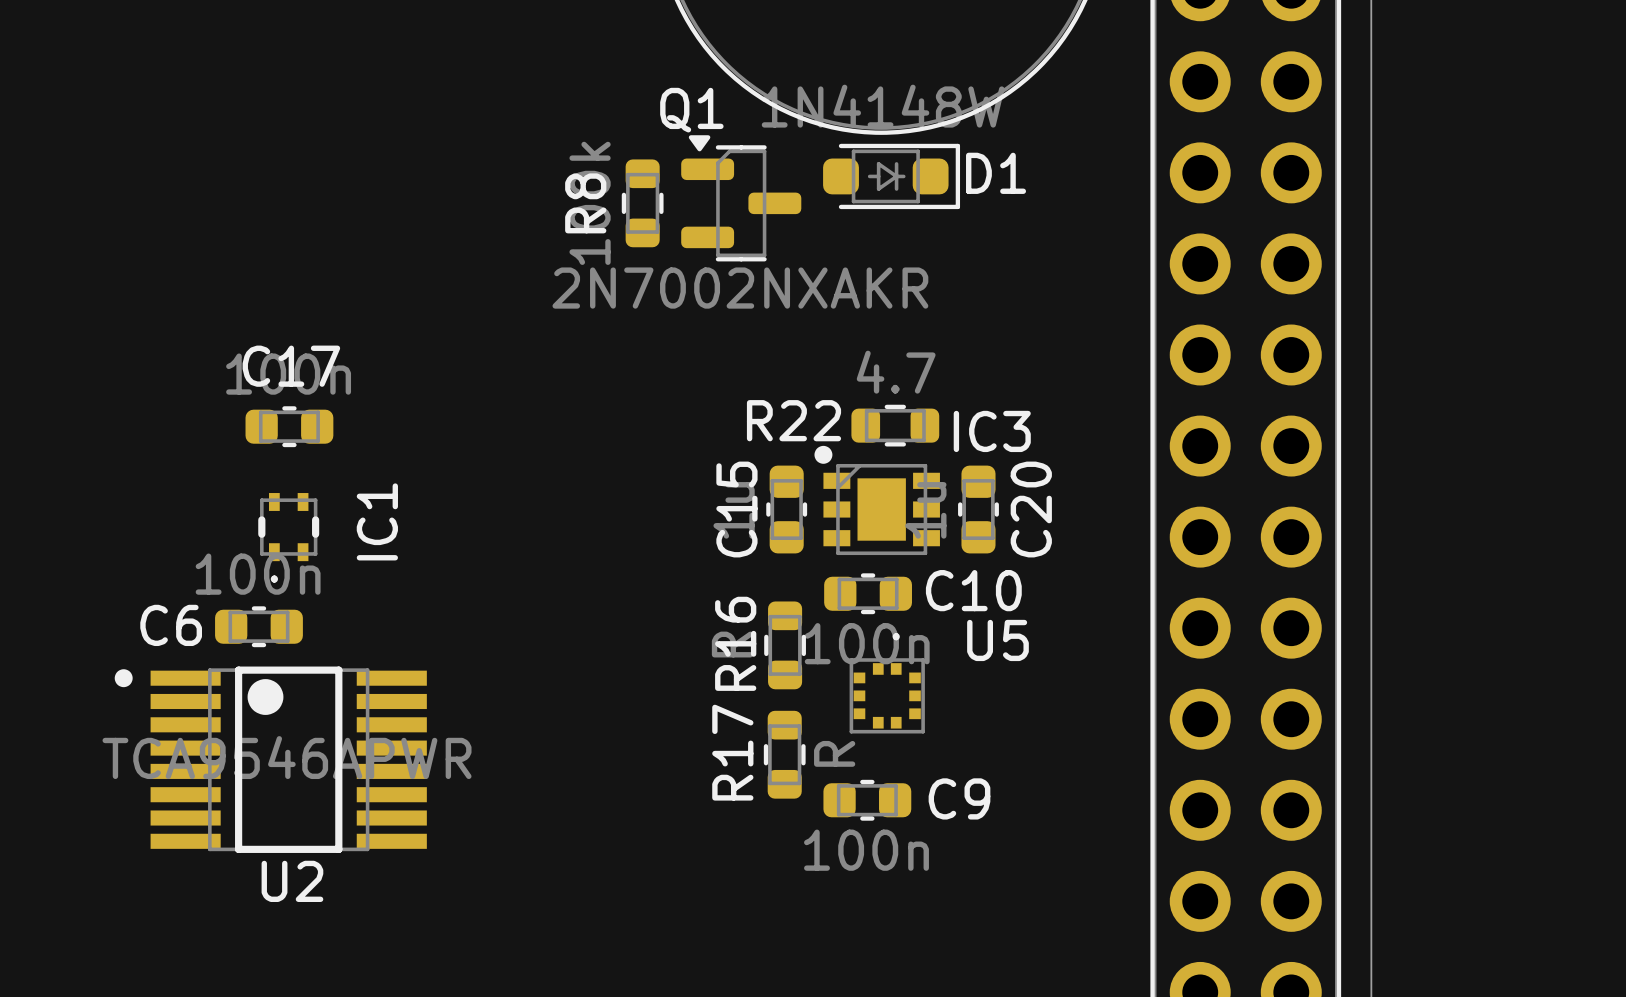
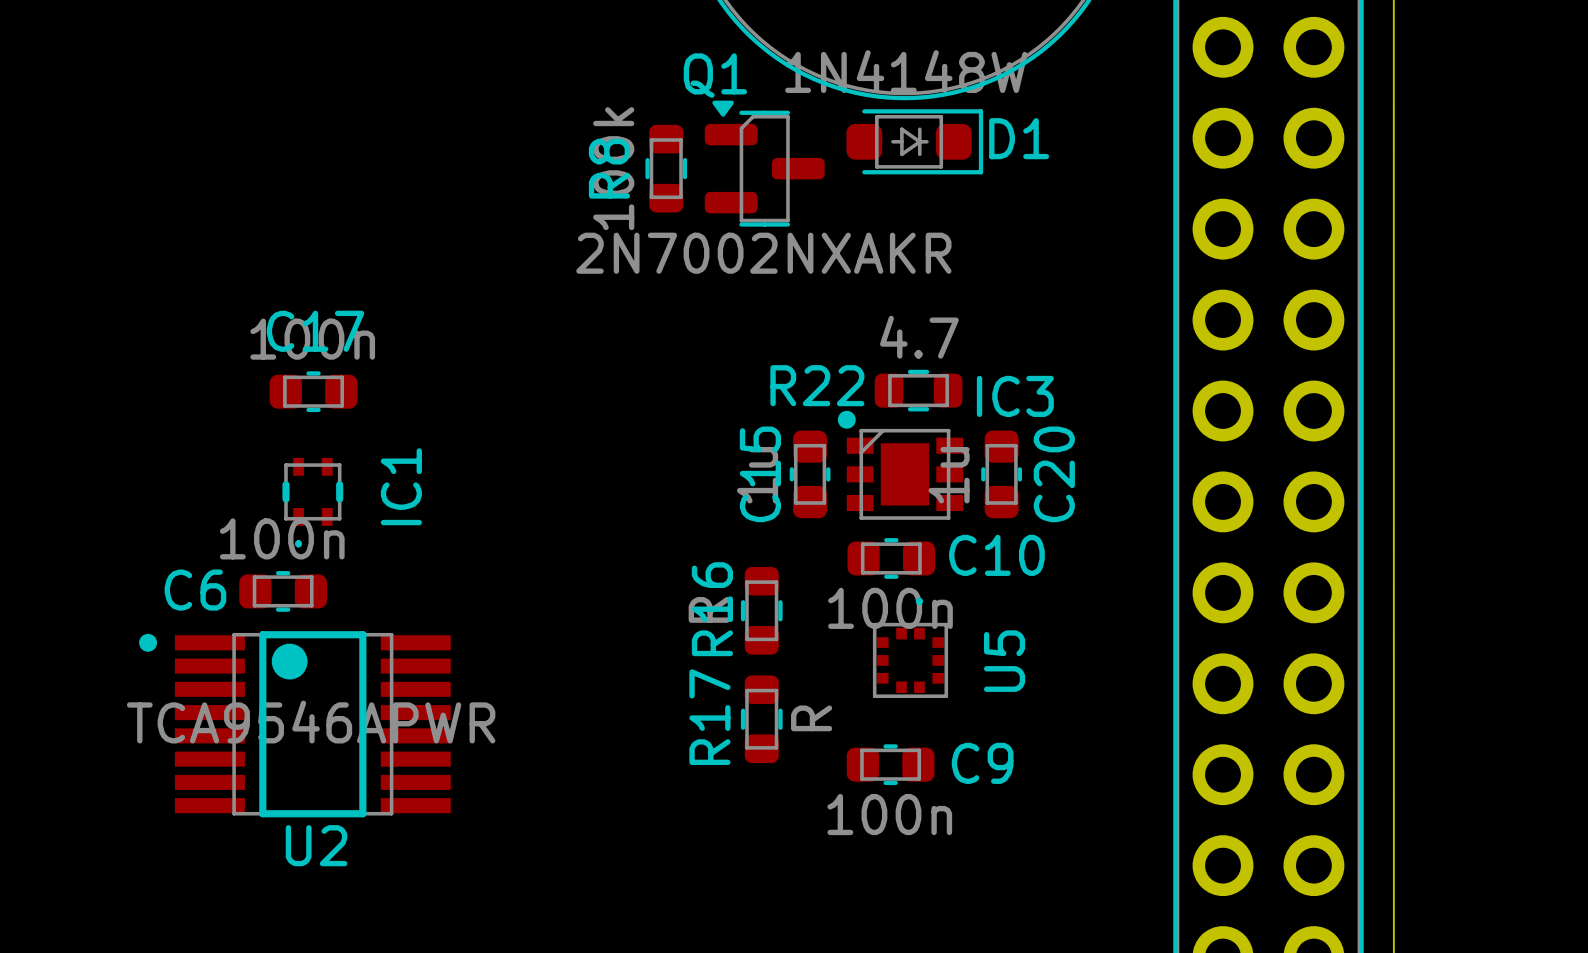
U5 name rotation: 0° (997, 640) -> 90° counterclockwise (1004, 661)
R16 position: (785, 645) -> (761, 610)
R17 position: (784, 754) -> (761, 719)

